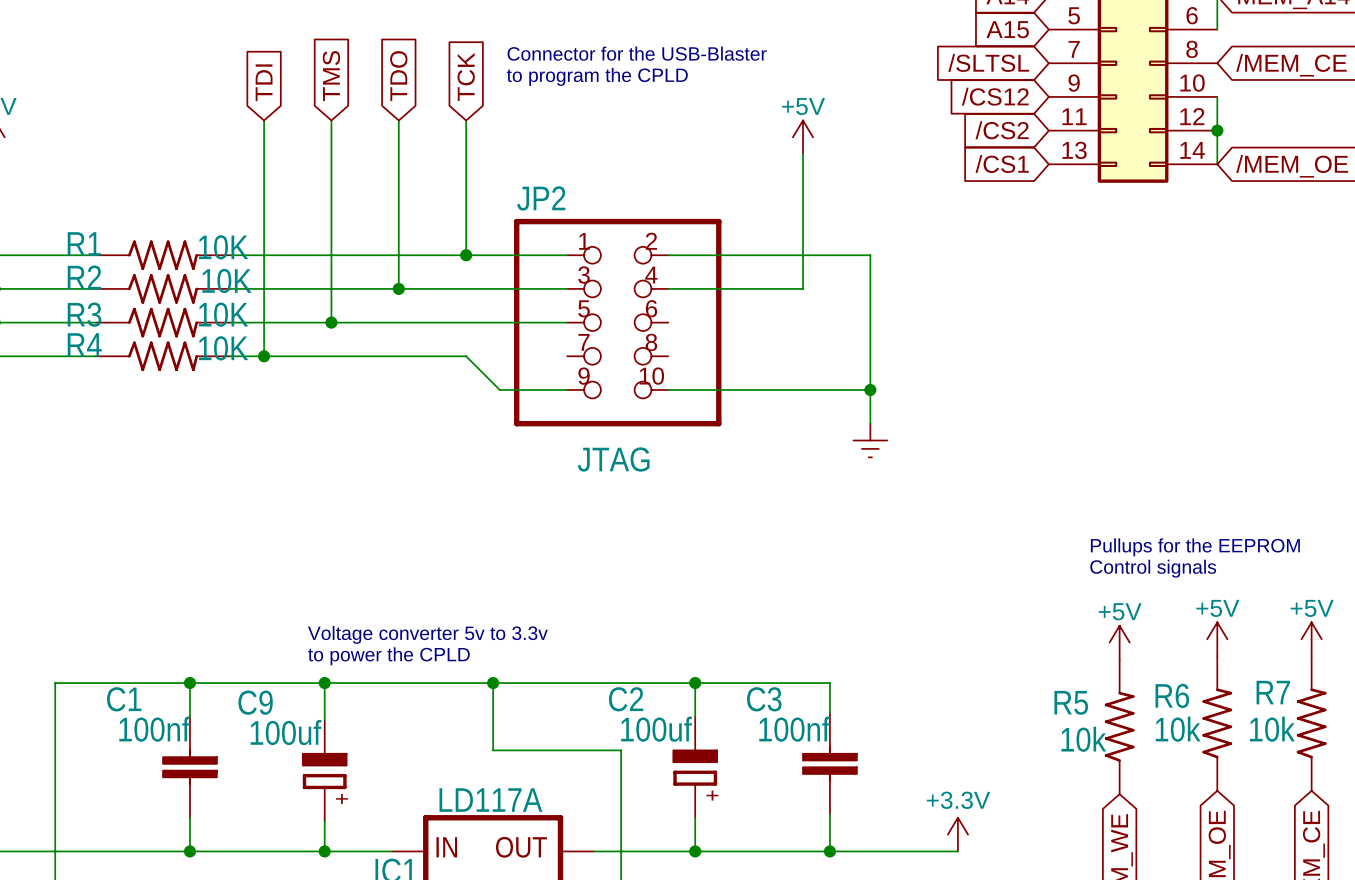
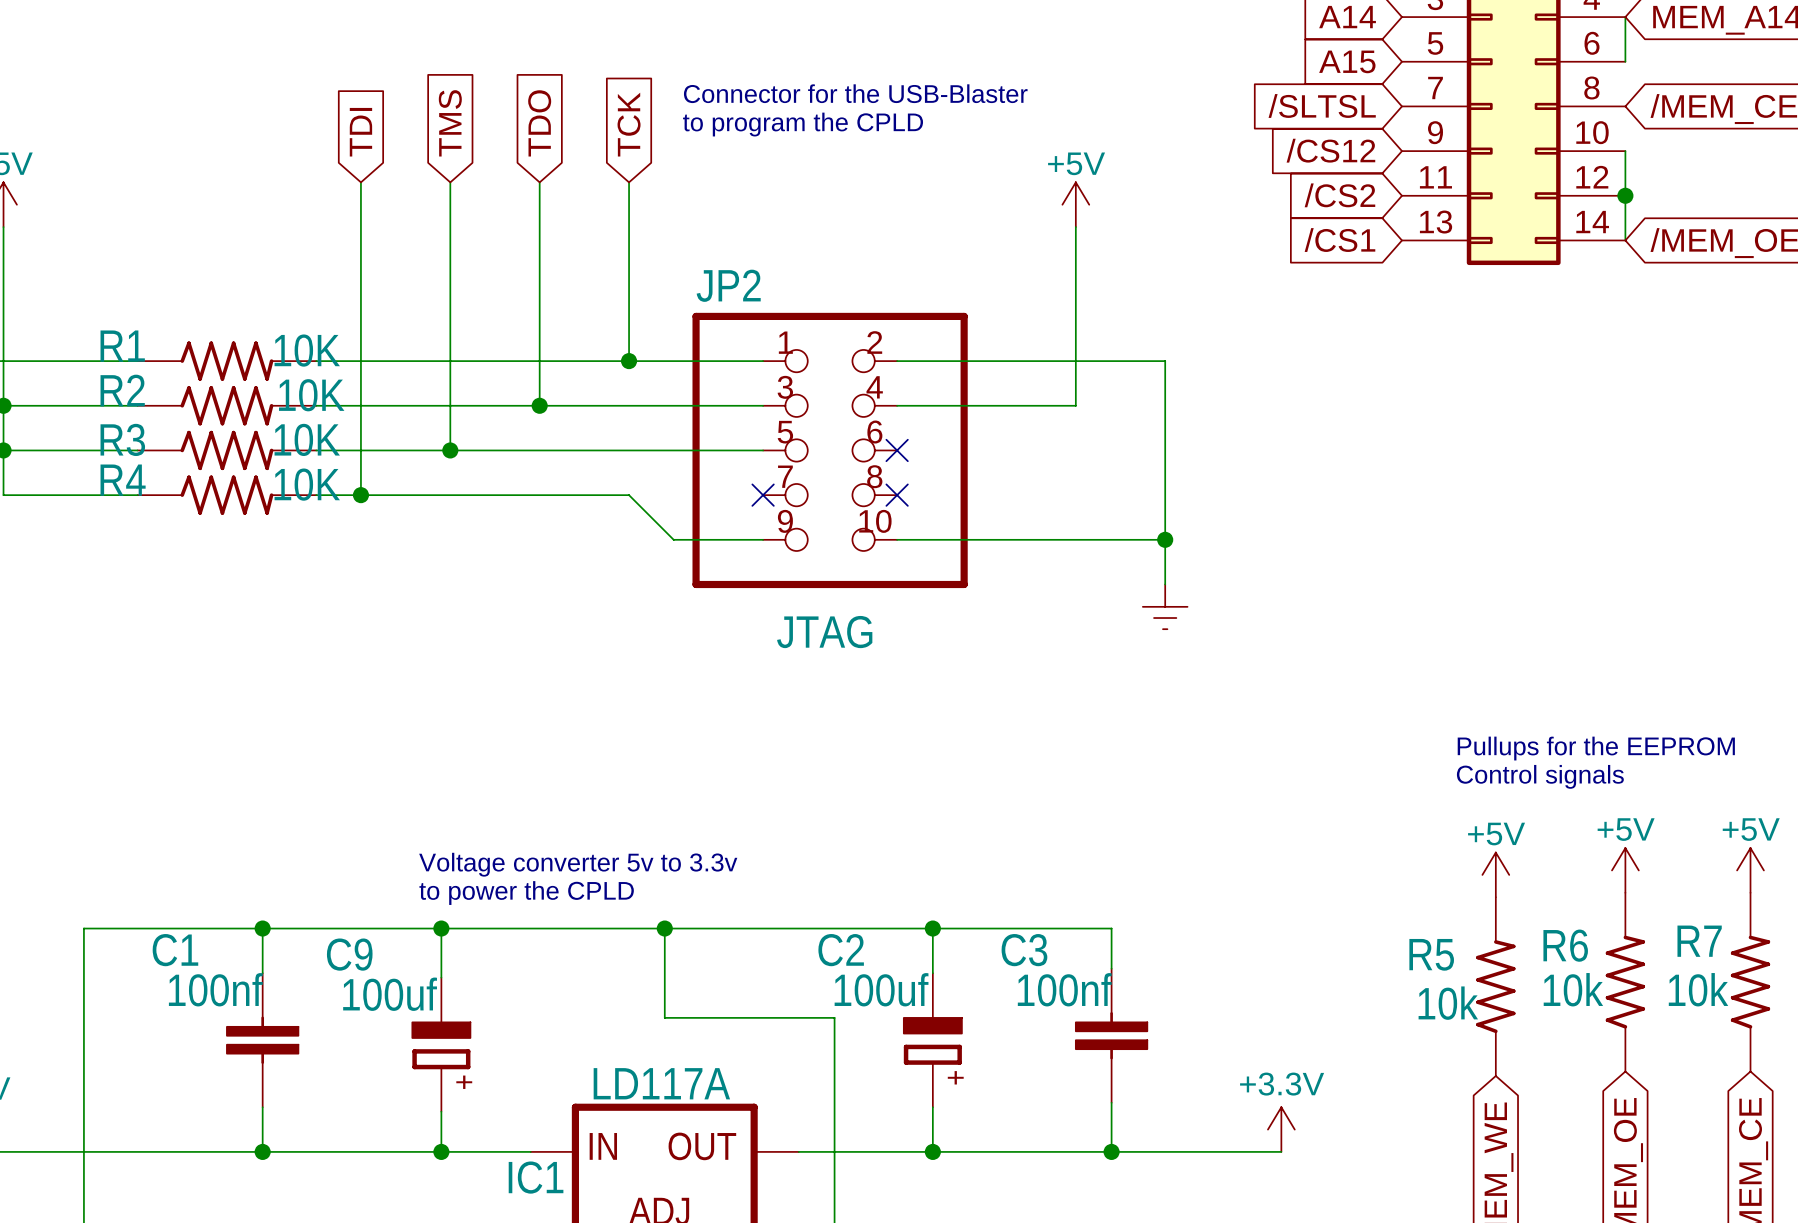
no-connect mark: none -> (897, 450)
no-connect mark: none -> (763, 495)
no-connect mark: none -> (897, 495)

